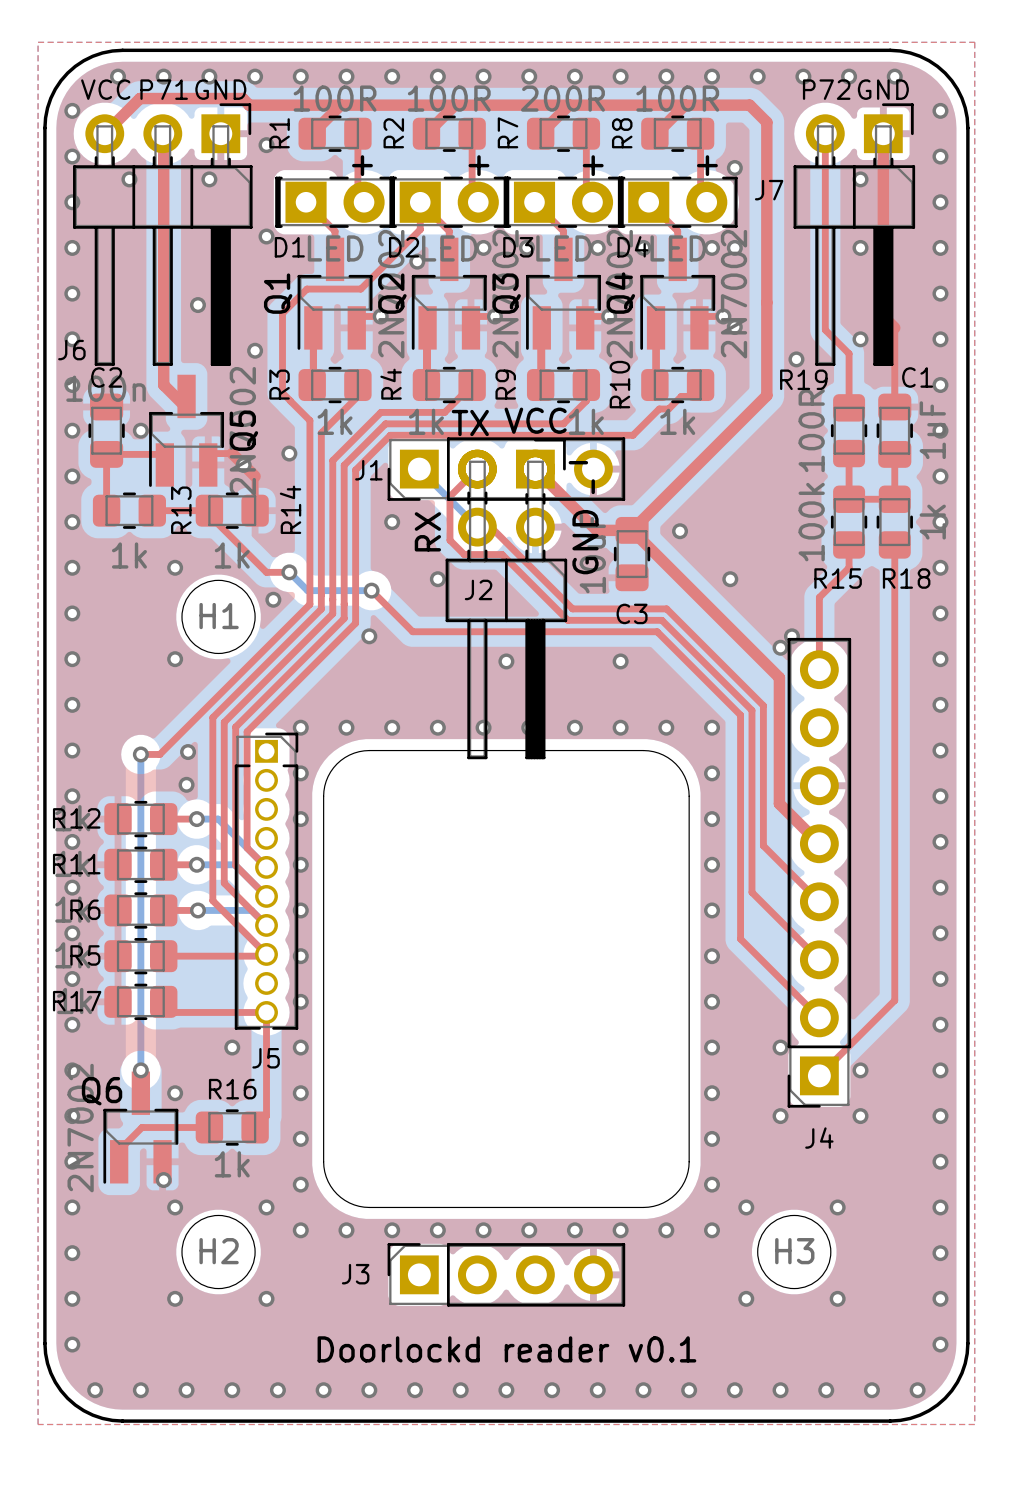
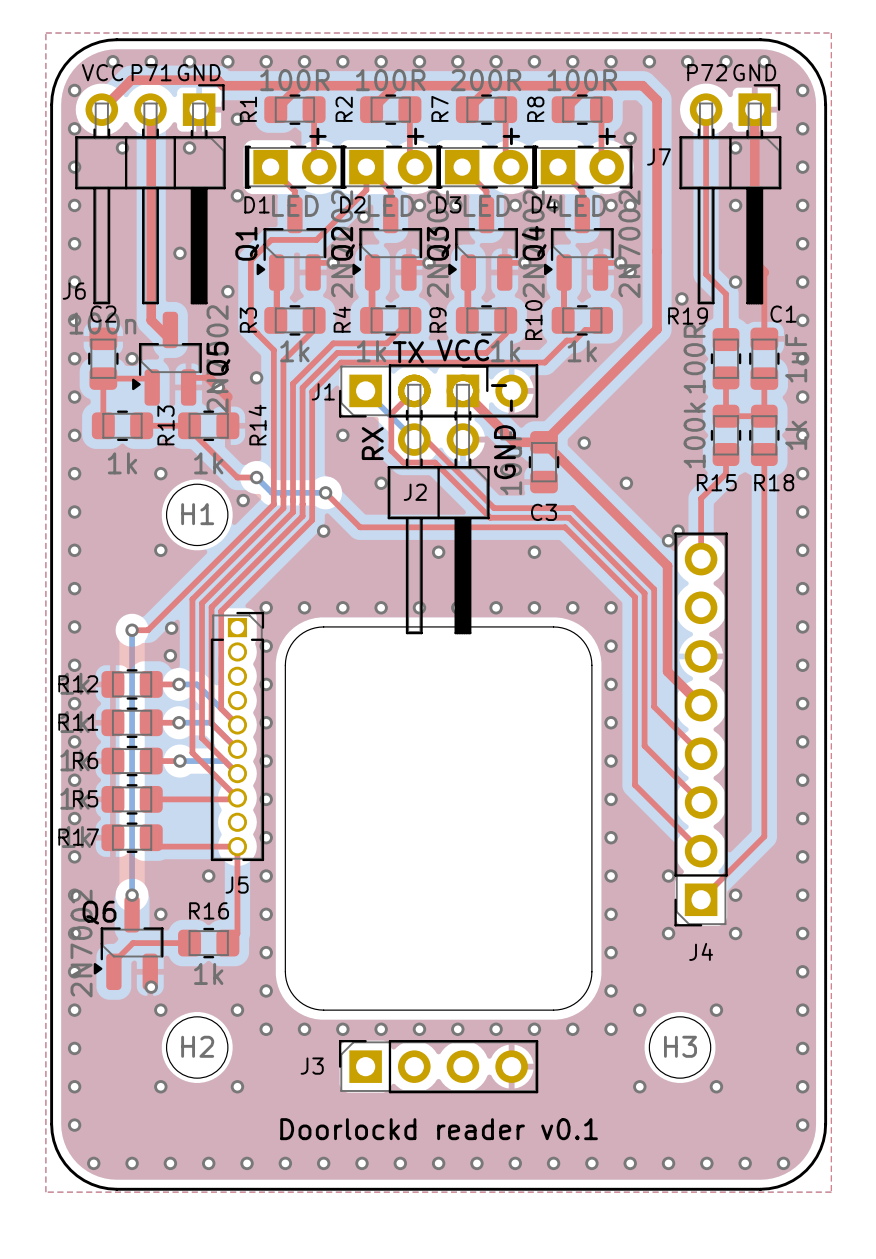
Q1 footprint: [297, 237, 373, 350] -> [256, 196, 327, 291]
Q2 footprint: [411, 237, 487, 350] -> [352, 196, 423, 291]
Q3 footprint: [526, 237, 601, 350] -> [448, 196, 518, 291]
Q4 footprint: [640, 237, 716, 350] -> [544, 196, 614, 291]
Q5 footprint: [149, 374, 225, 487] -> [132, 311, 202, 406]
Q6 footprint: [103, 1071, 179, 1184] -> [93, 896, 164, 991]

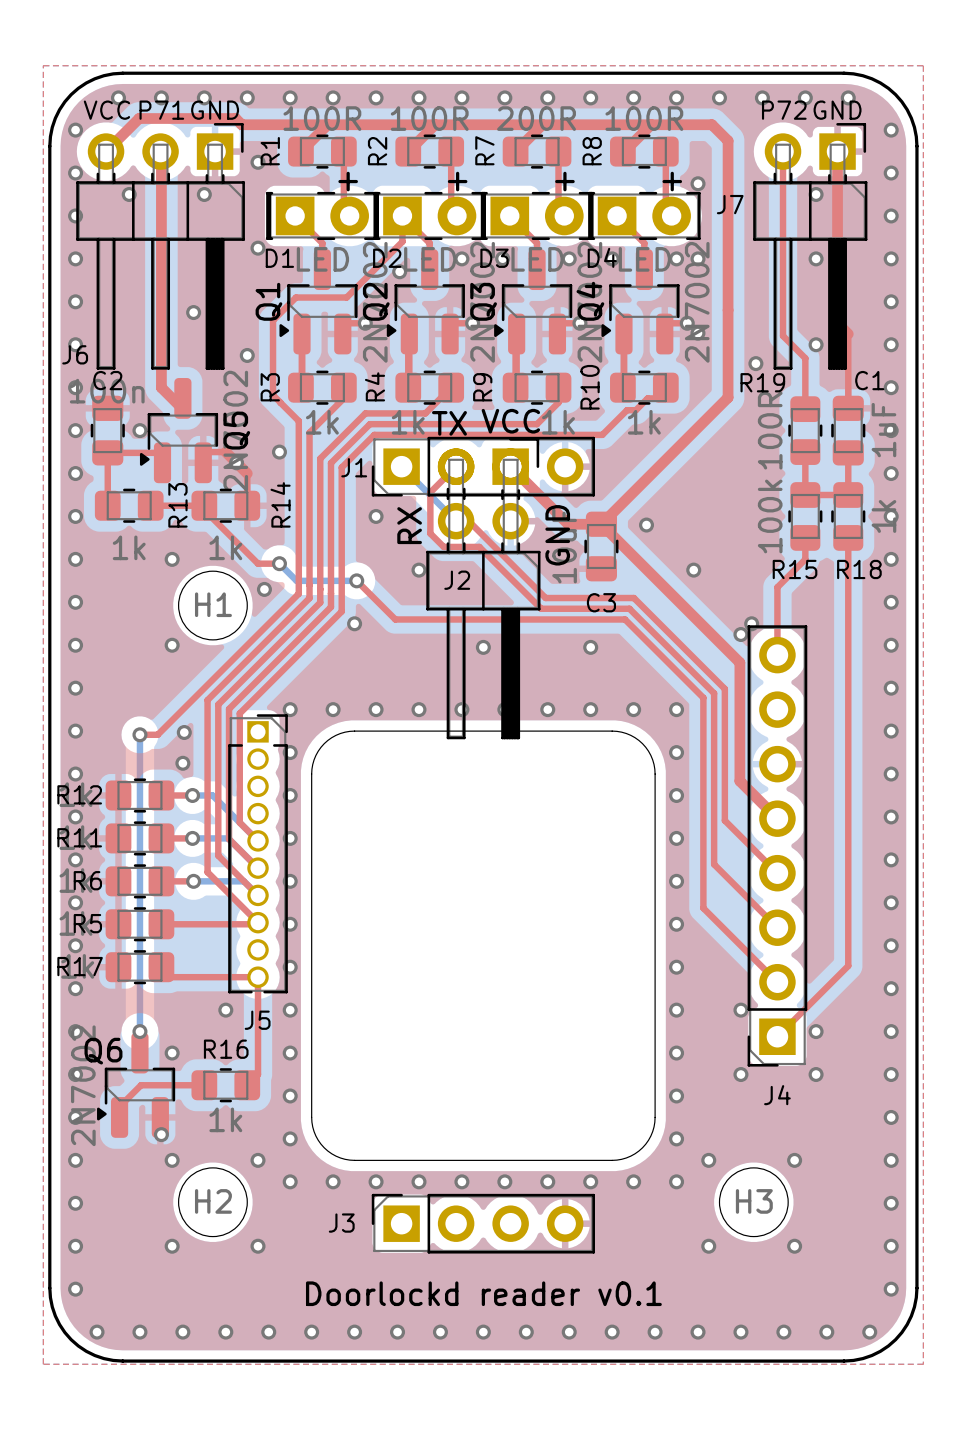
line: (492, 385) (505, 385) -> none
line: (511, 400) (511, 410) -> none

